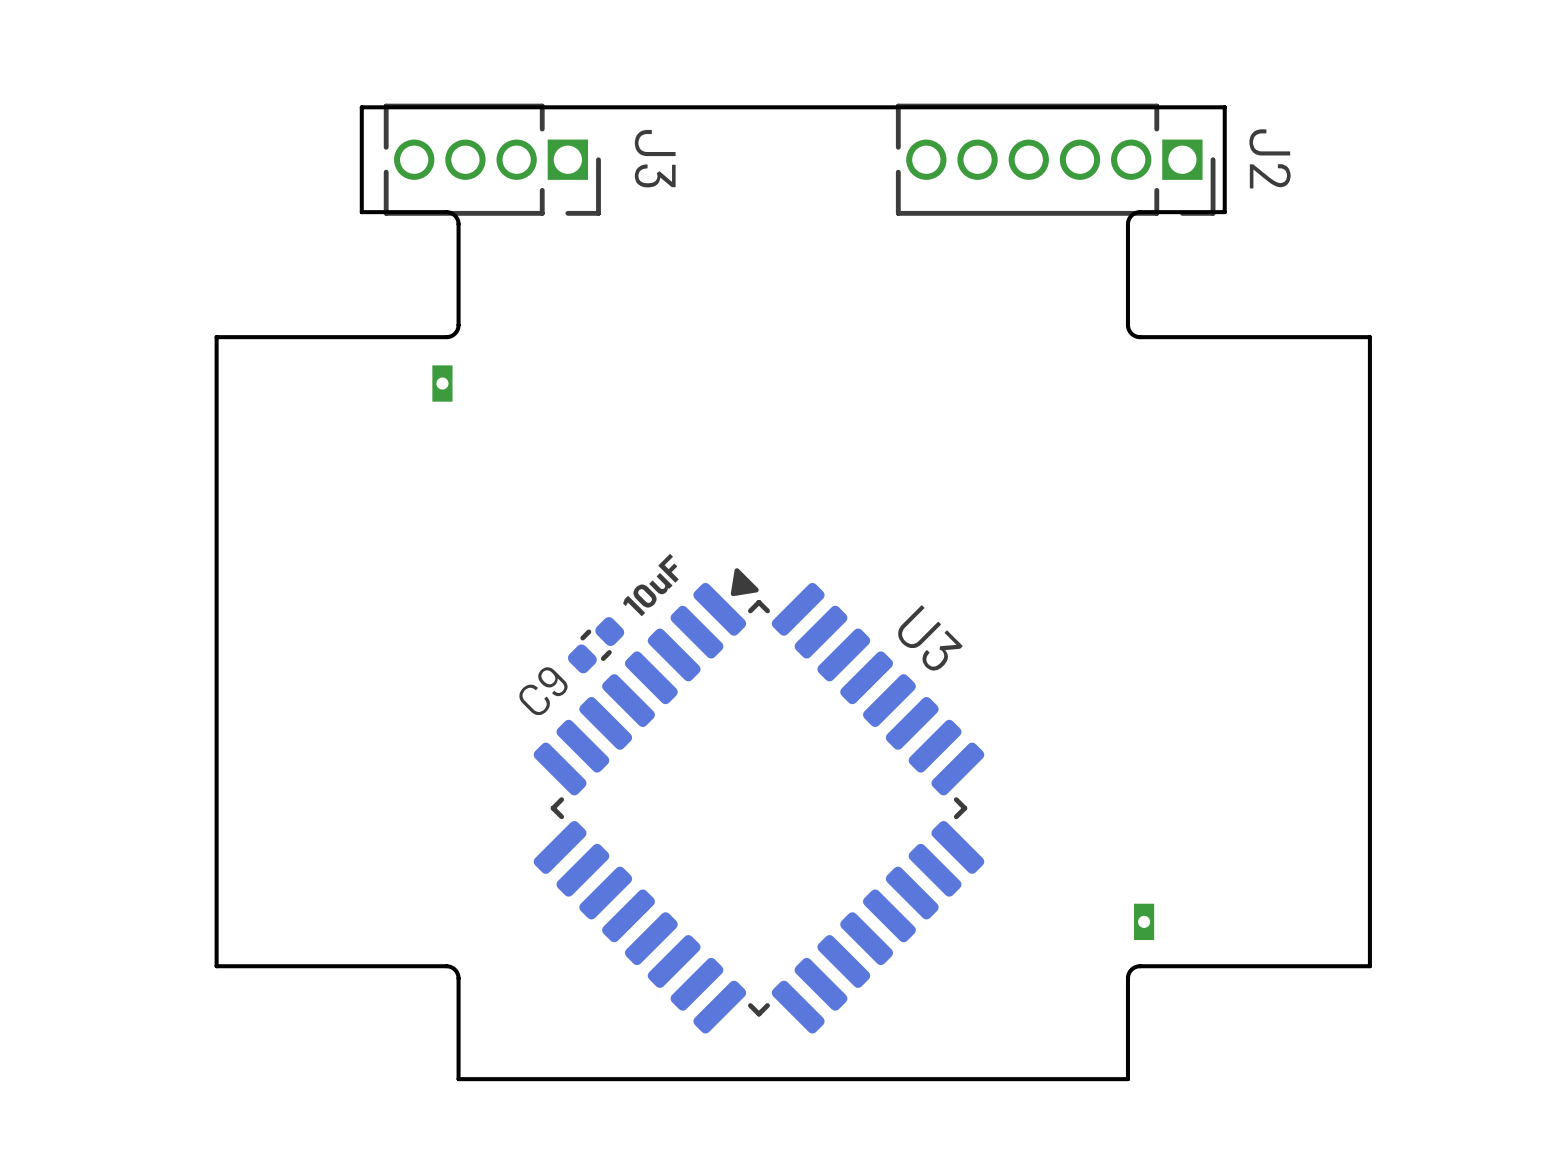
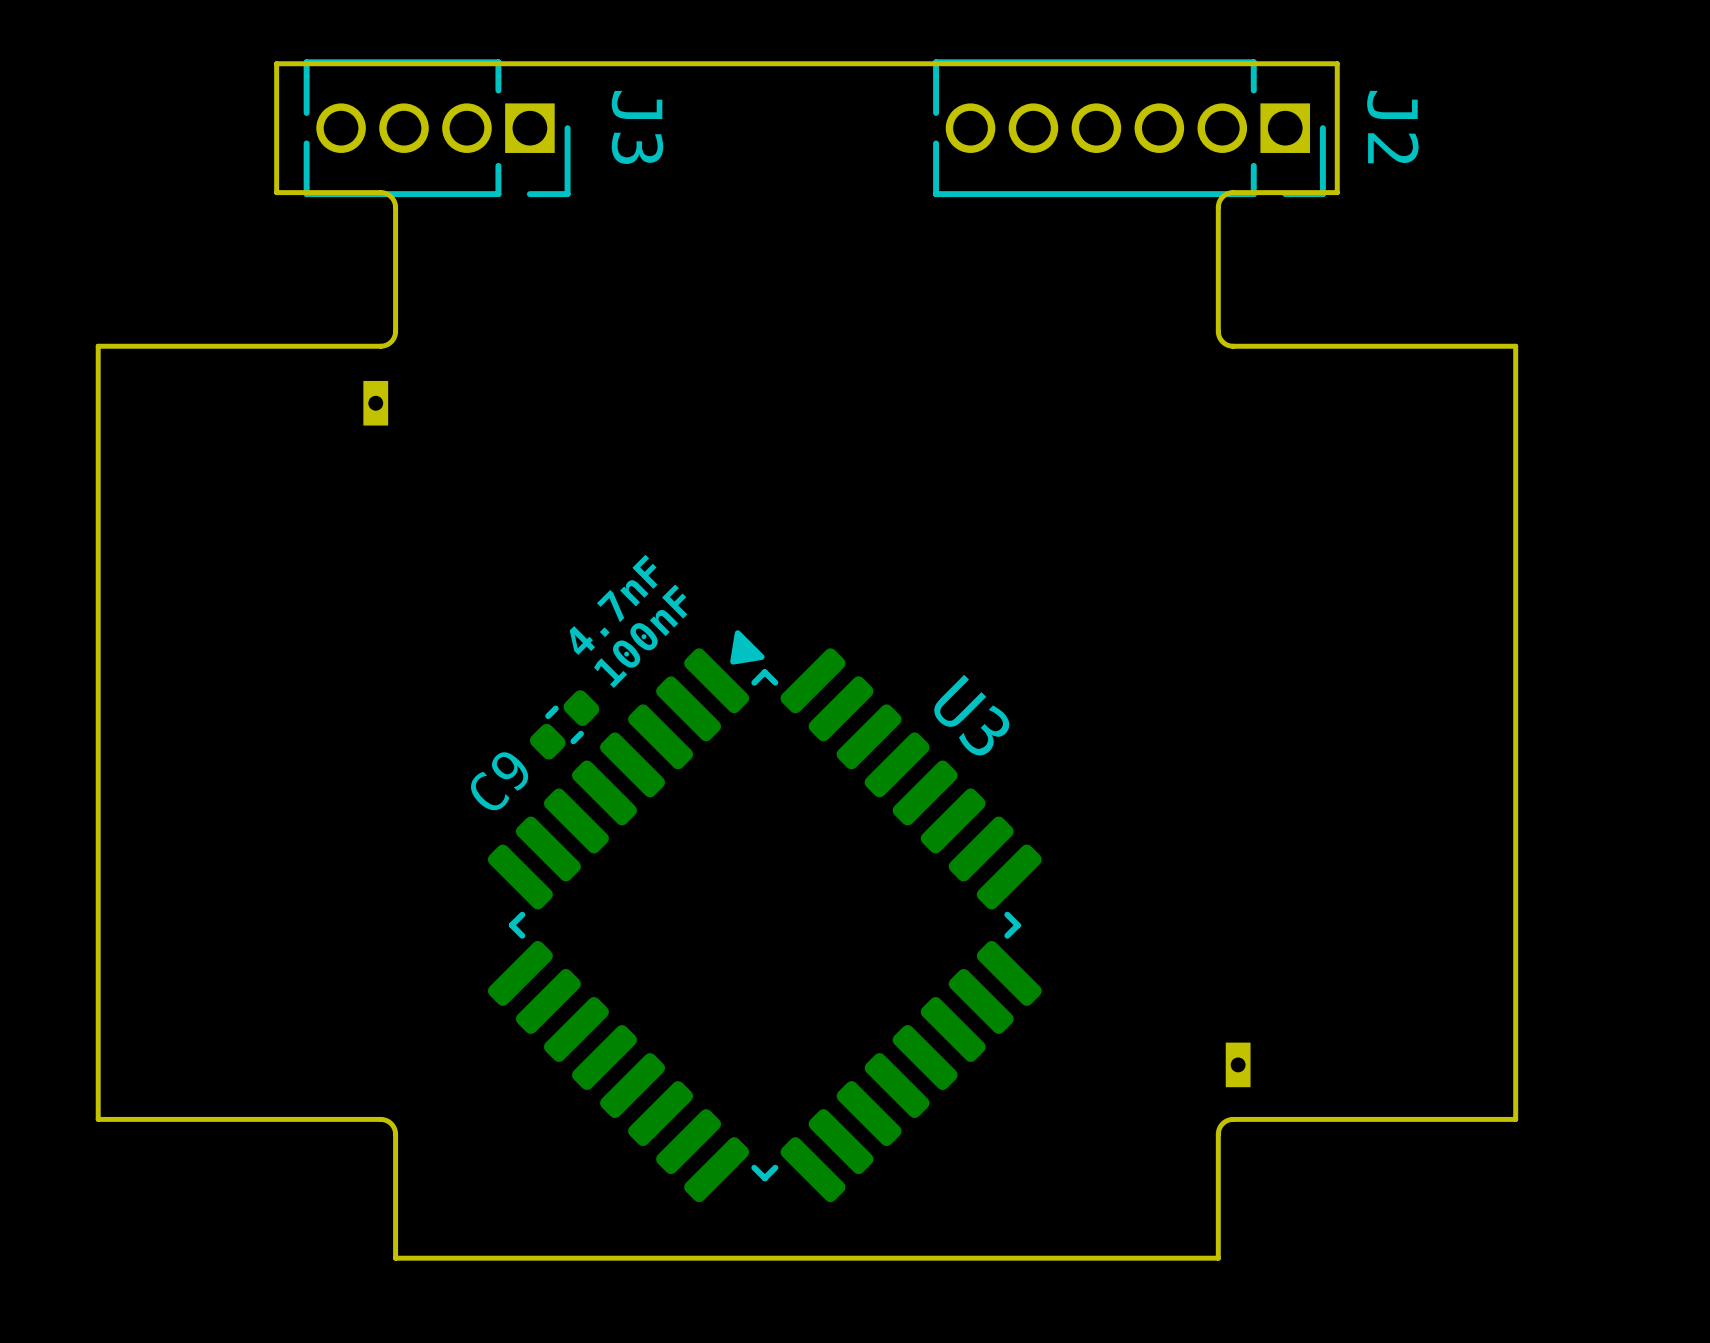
text: none -> 4.7nF (613, 604)
text: 10uF (650, 585) -> 100nF (640, 636)

